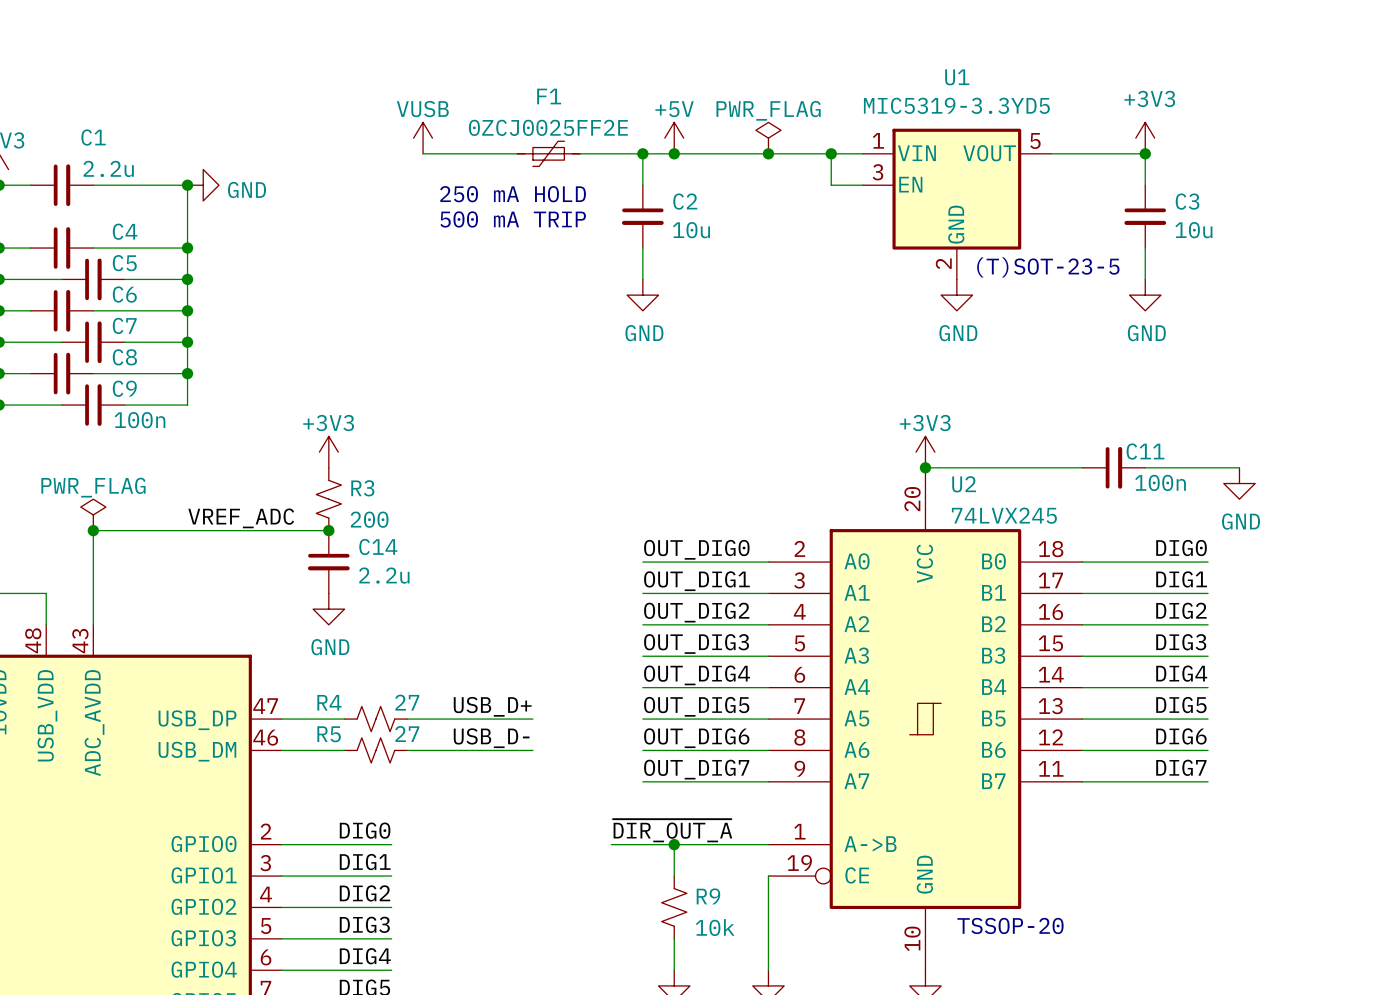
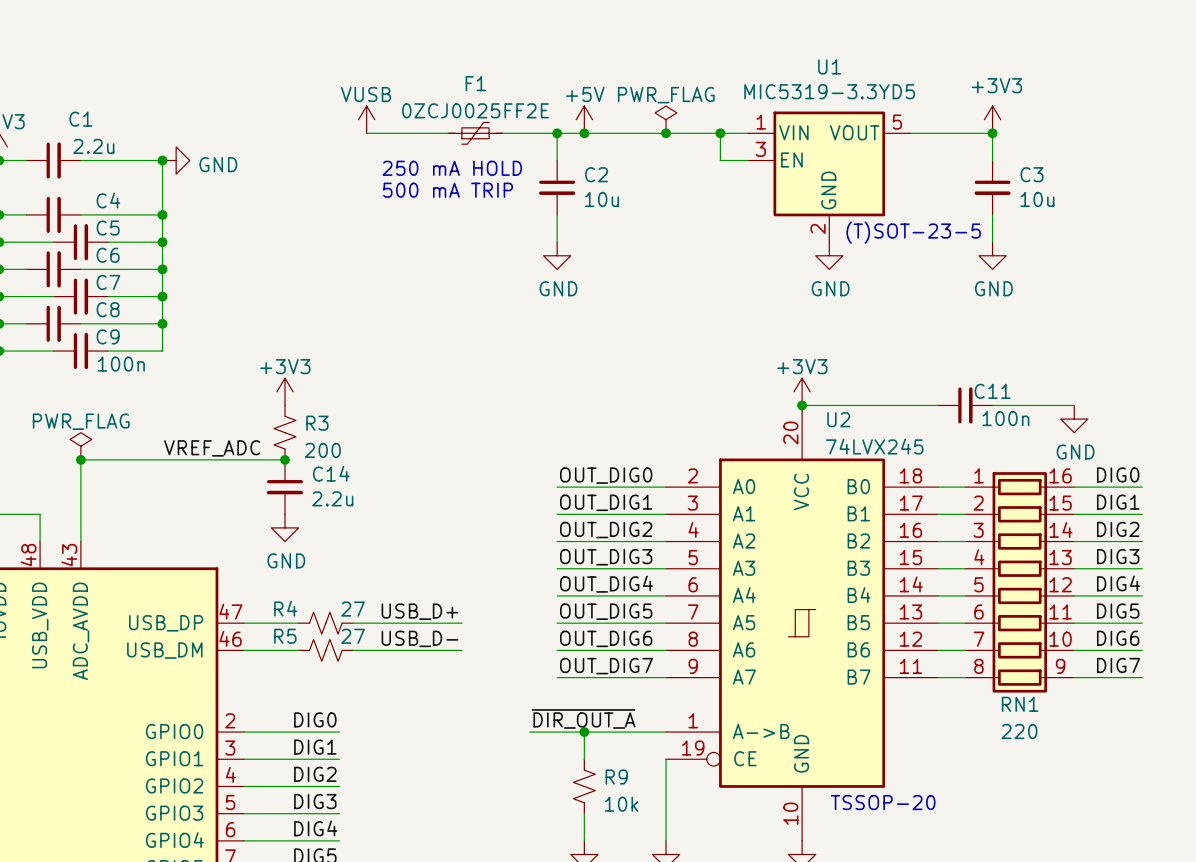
label position: DIG0 (1181, 548) -> DIG0 (1118, 474)
wire: none -> (1074, 487) (1142, 487)
label position: DIG1 (1181, 579) -> DIG1 (1118, 502)
wire: none -> (1074, 514) (1142, 514)
label position: DIG2 (1181, 610) -> DIG2 (1118, 529)
wire: none -> (1074, 541) (1142, 541)
label position: DIG3 (1181, 642) -> DIG3 (1118, 556)
wire: none -> (1074, 568) (1142, 568)
RN1: none -> 220 (1019, 582)
label position: DIG4 (1181, 673) -> DIG4 (1118, 583)
wire: none -> (1074, 595) (1142, 595)
label position: DIG5 (1181, 705) -> DIG5 (1118, 611)
wire: none -> (1074, 623) (1142, 623)
label position: DIG6 (1181, 736) -> DIG6 (1118, 638)
wire: none -> (1074, 650) (1142, 650)
label position: DIG7 (1181, 767) -> DIG7 (1118, 665)
wire: none -> (1074, 677) (1142, 677)

